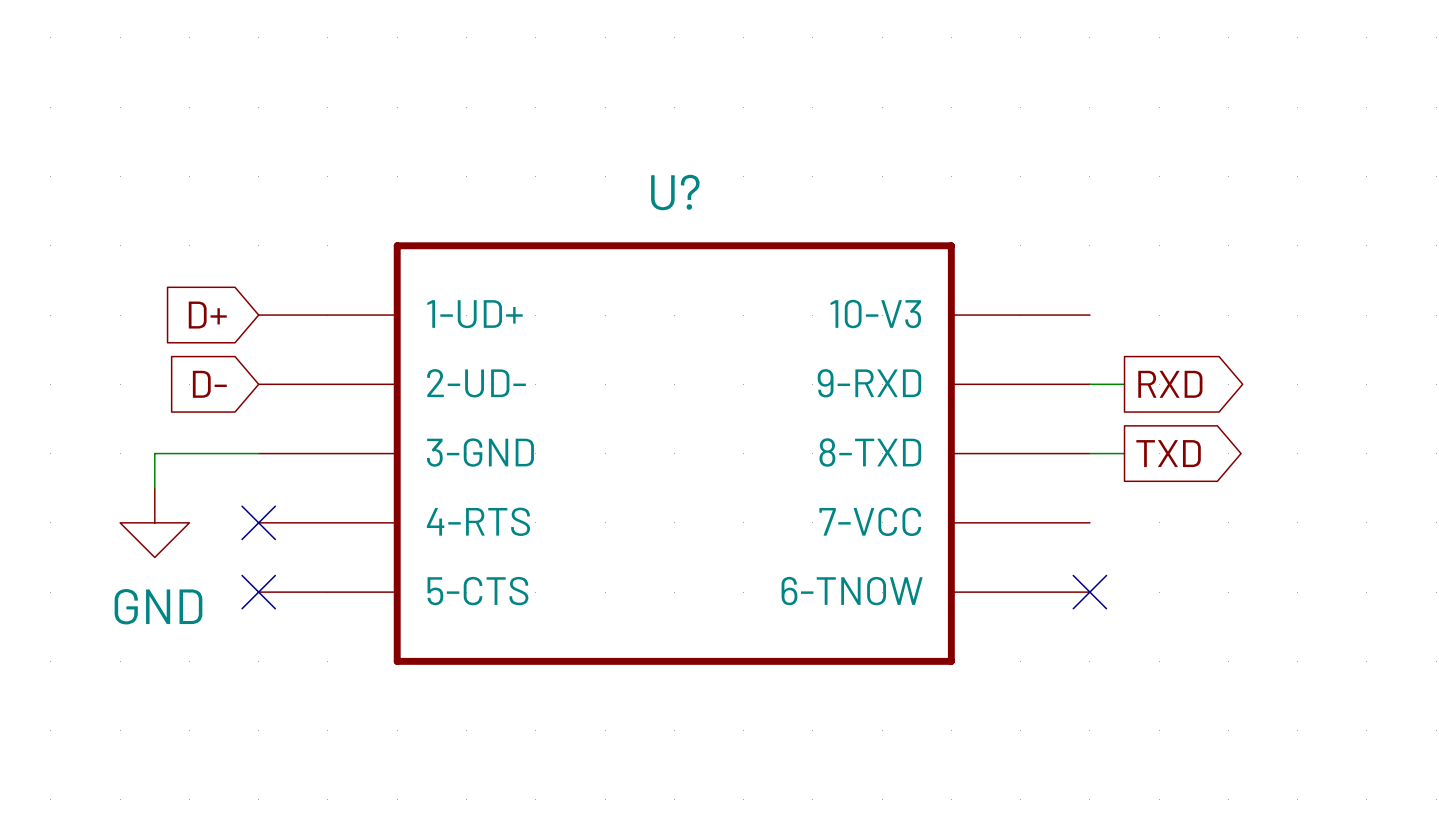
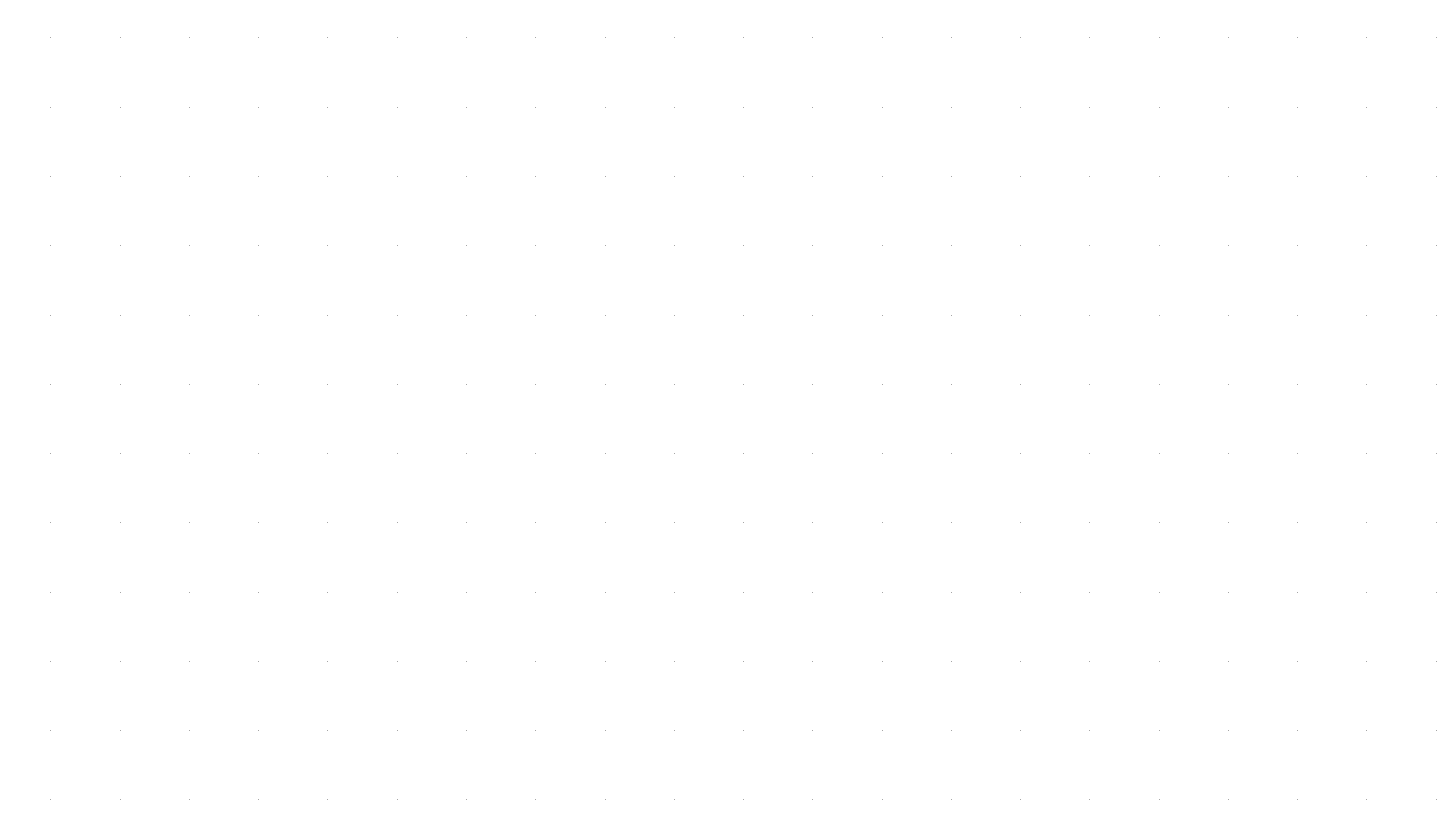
global label: D+ (207, 315) -> none
global label: D- (209, 384) -> none
wire: (1089, 384) (1124, 384) -> none
global label: RXD (1170, 384) -> none
wire: (258, 453) (154, 453) (154, 488) -> none
U?: (674, 453) -> none
wire: (1089, 453) (1124, 453) -> none
global label: TXD (1168, 453) -> none
power symbol: GND (154, 522) -> none
no-connect mark: (258, 522) -> none
no-connect mark: (258, 592) -> none
no-connect mark: (1089, 592) -> none

